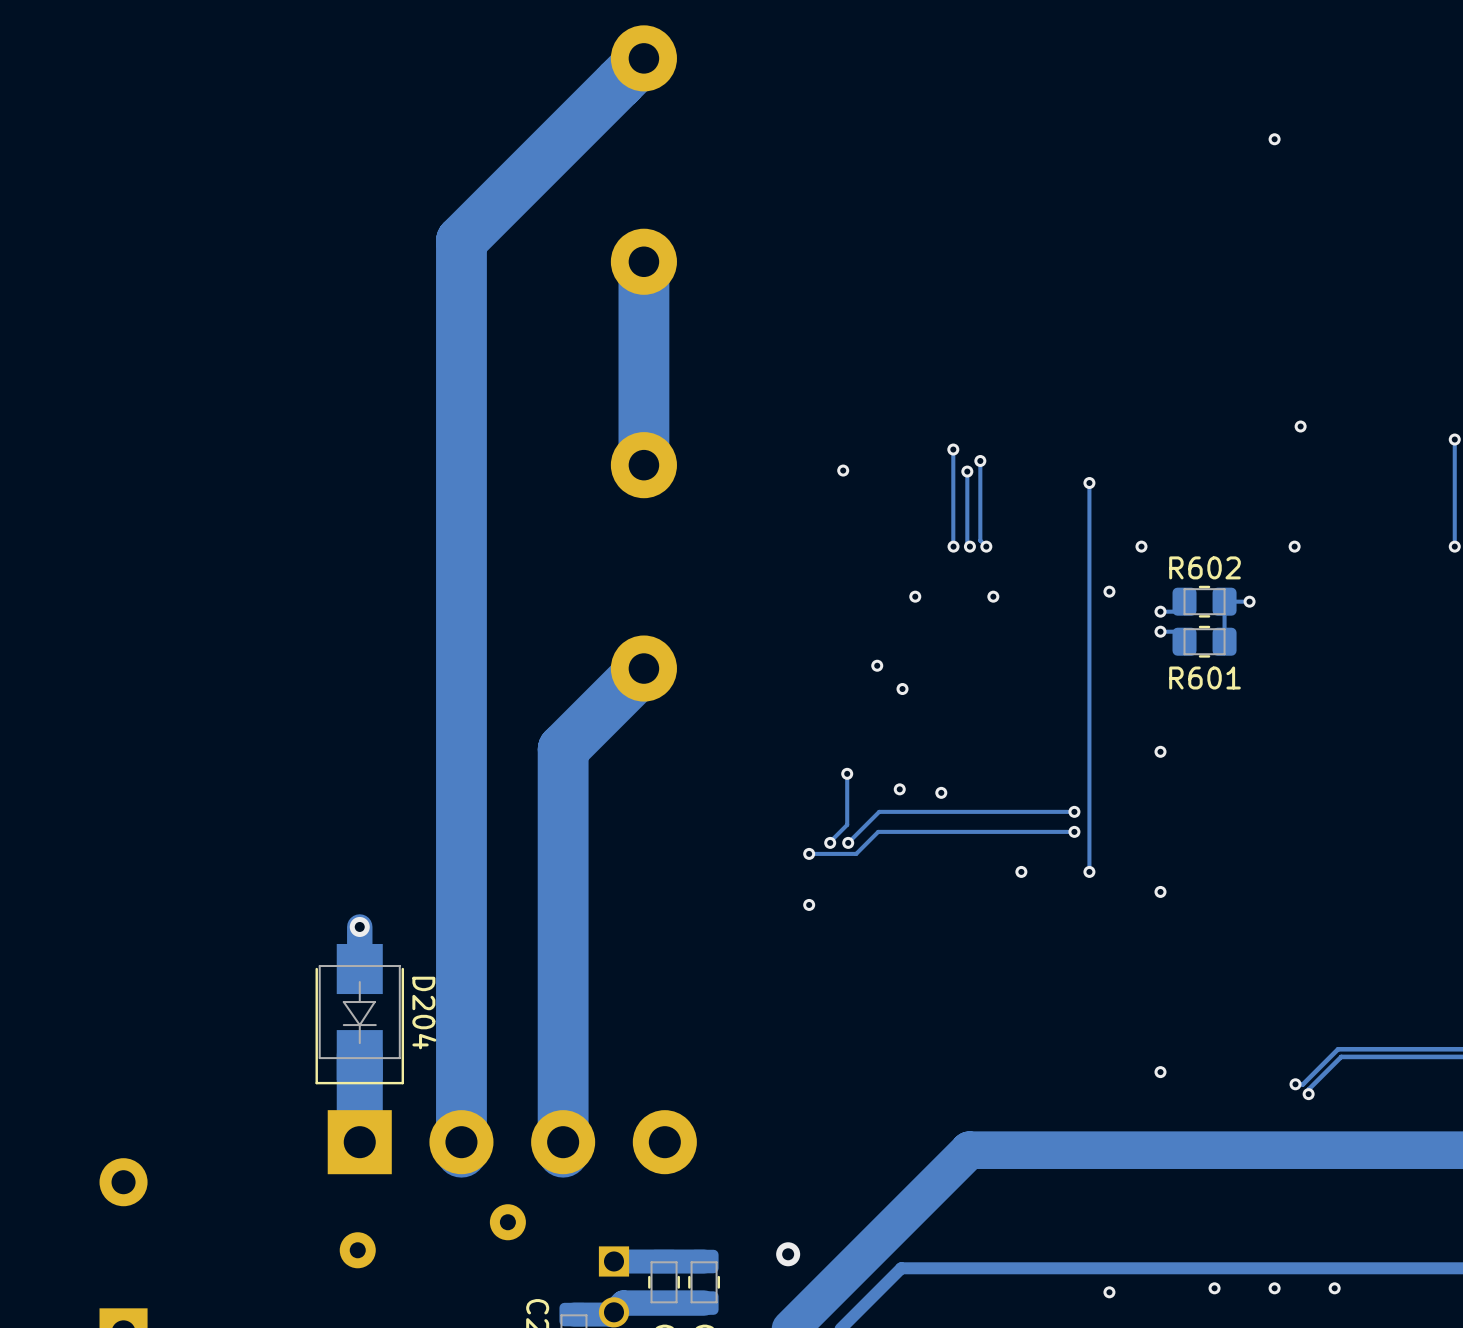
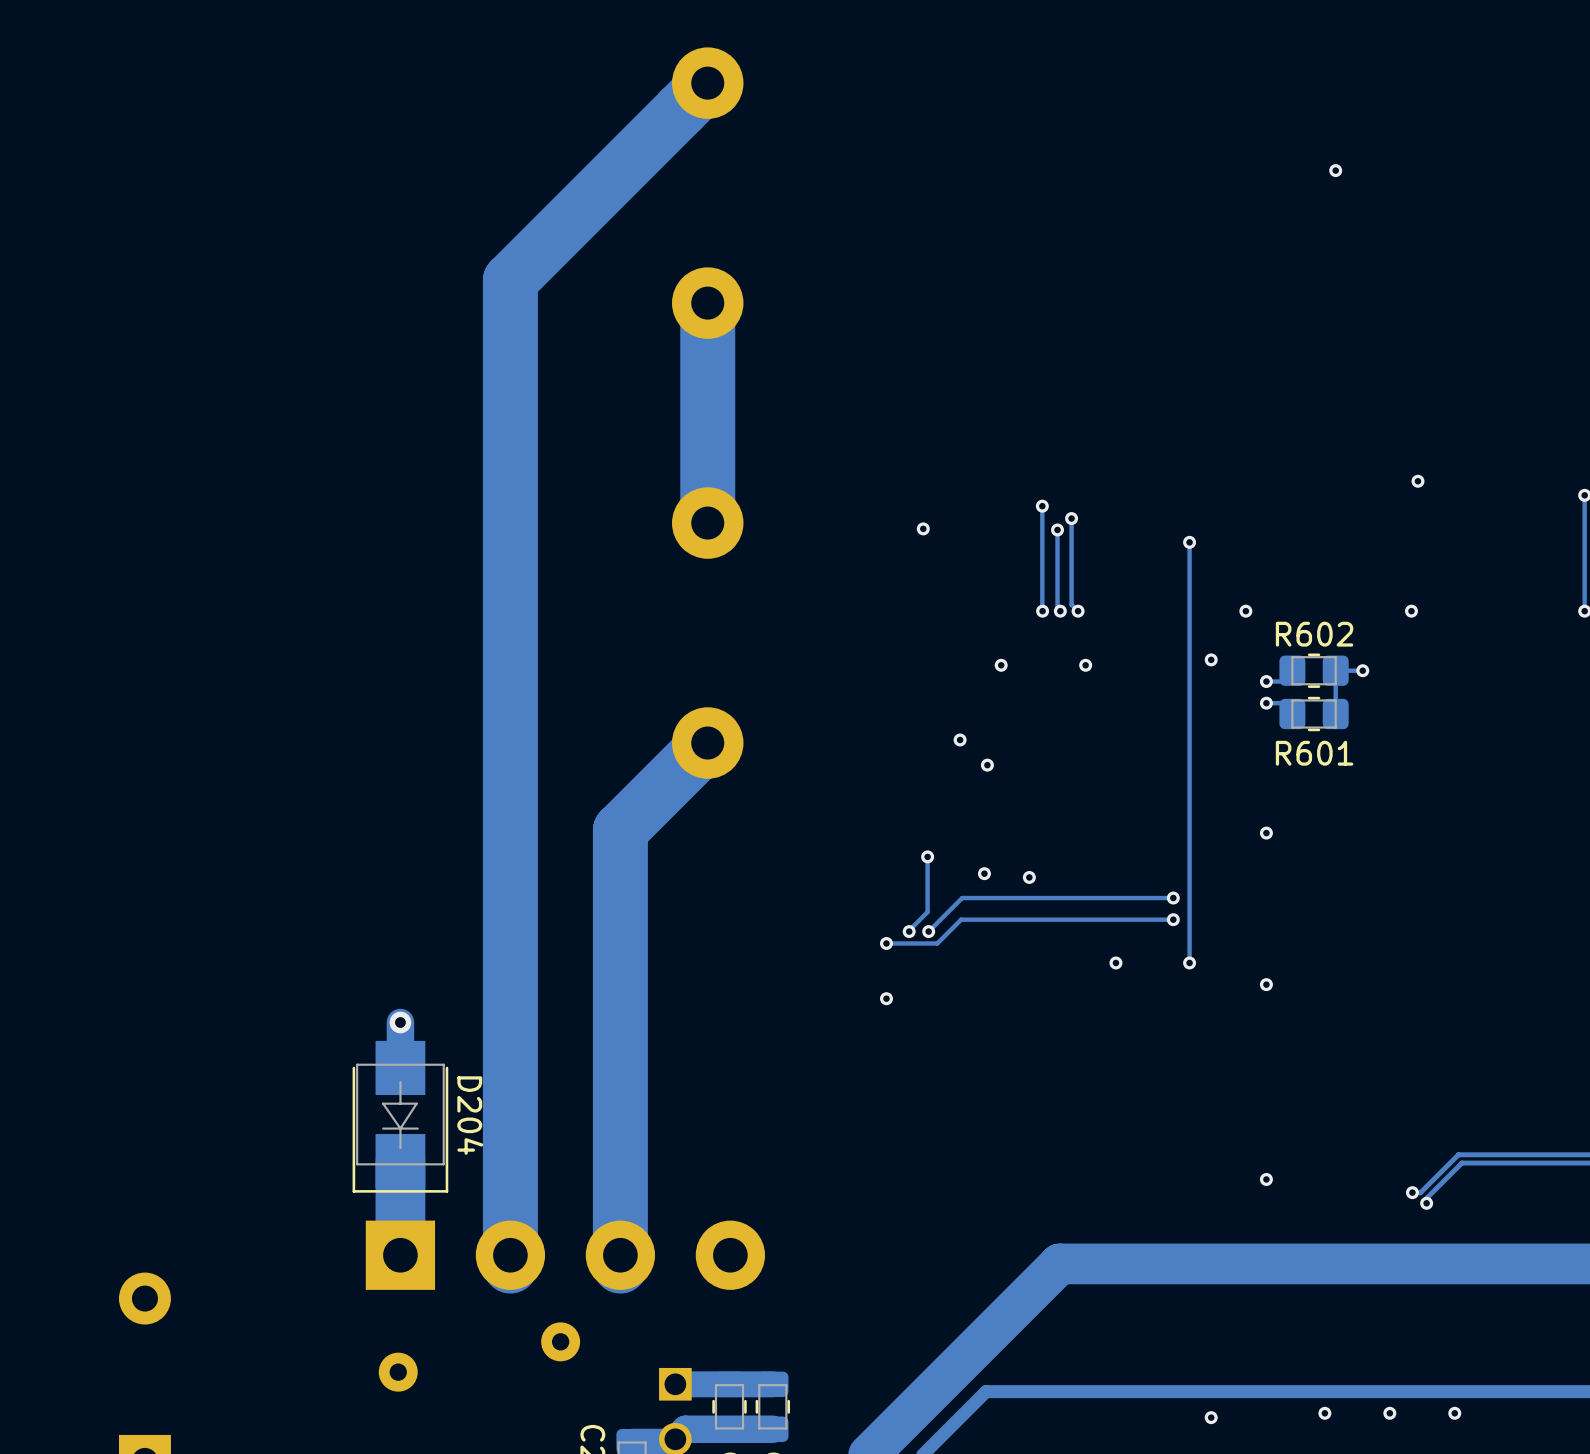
via position: (1274, 139) -> (1335, 170)
via: (788, 1254) -> none

